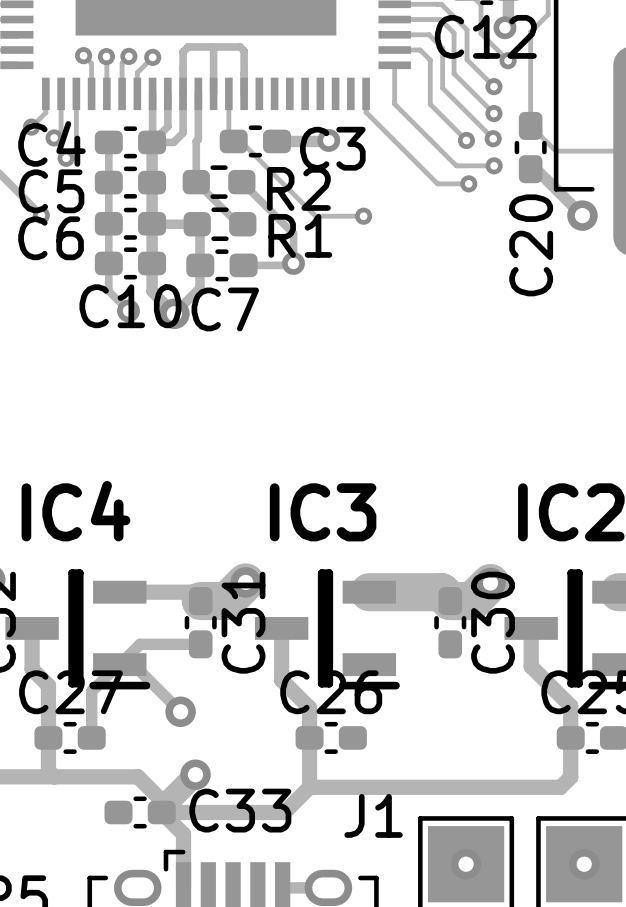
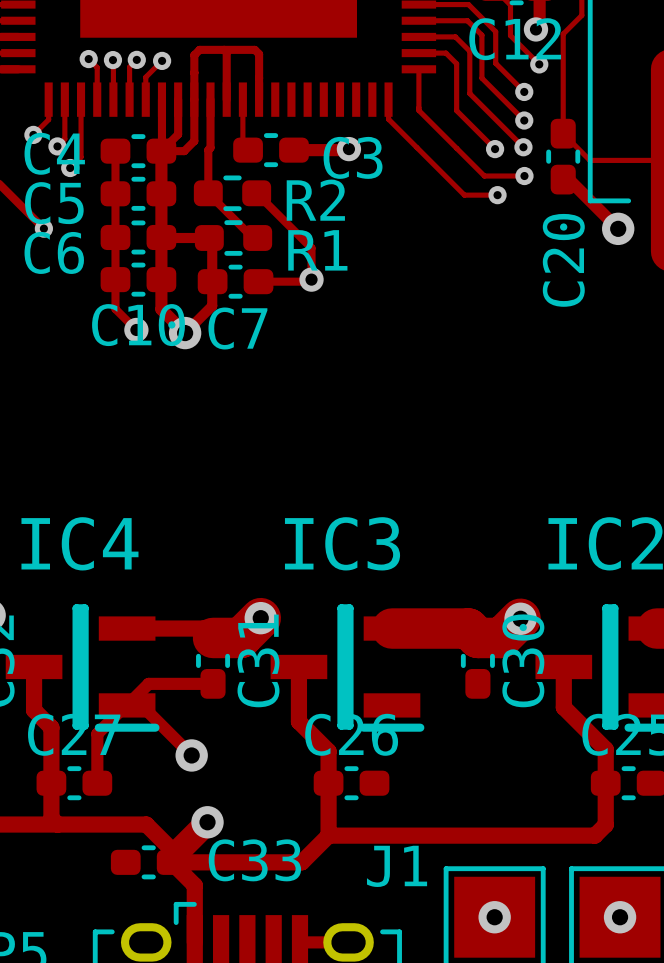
track: (233, 141) (240, 141) (315, 216) (363, 216) -> none
via: (363, 216) -> none

